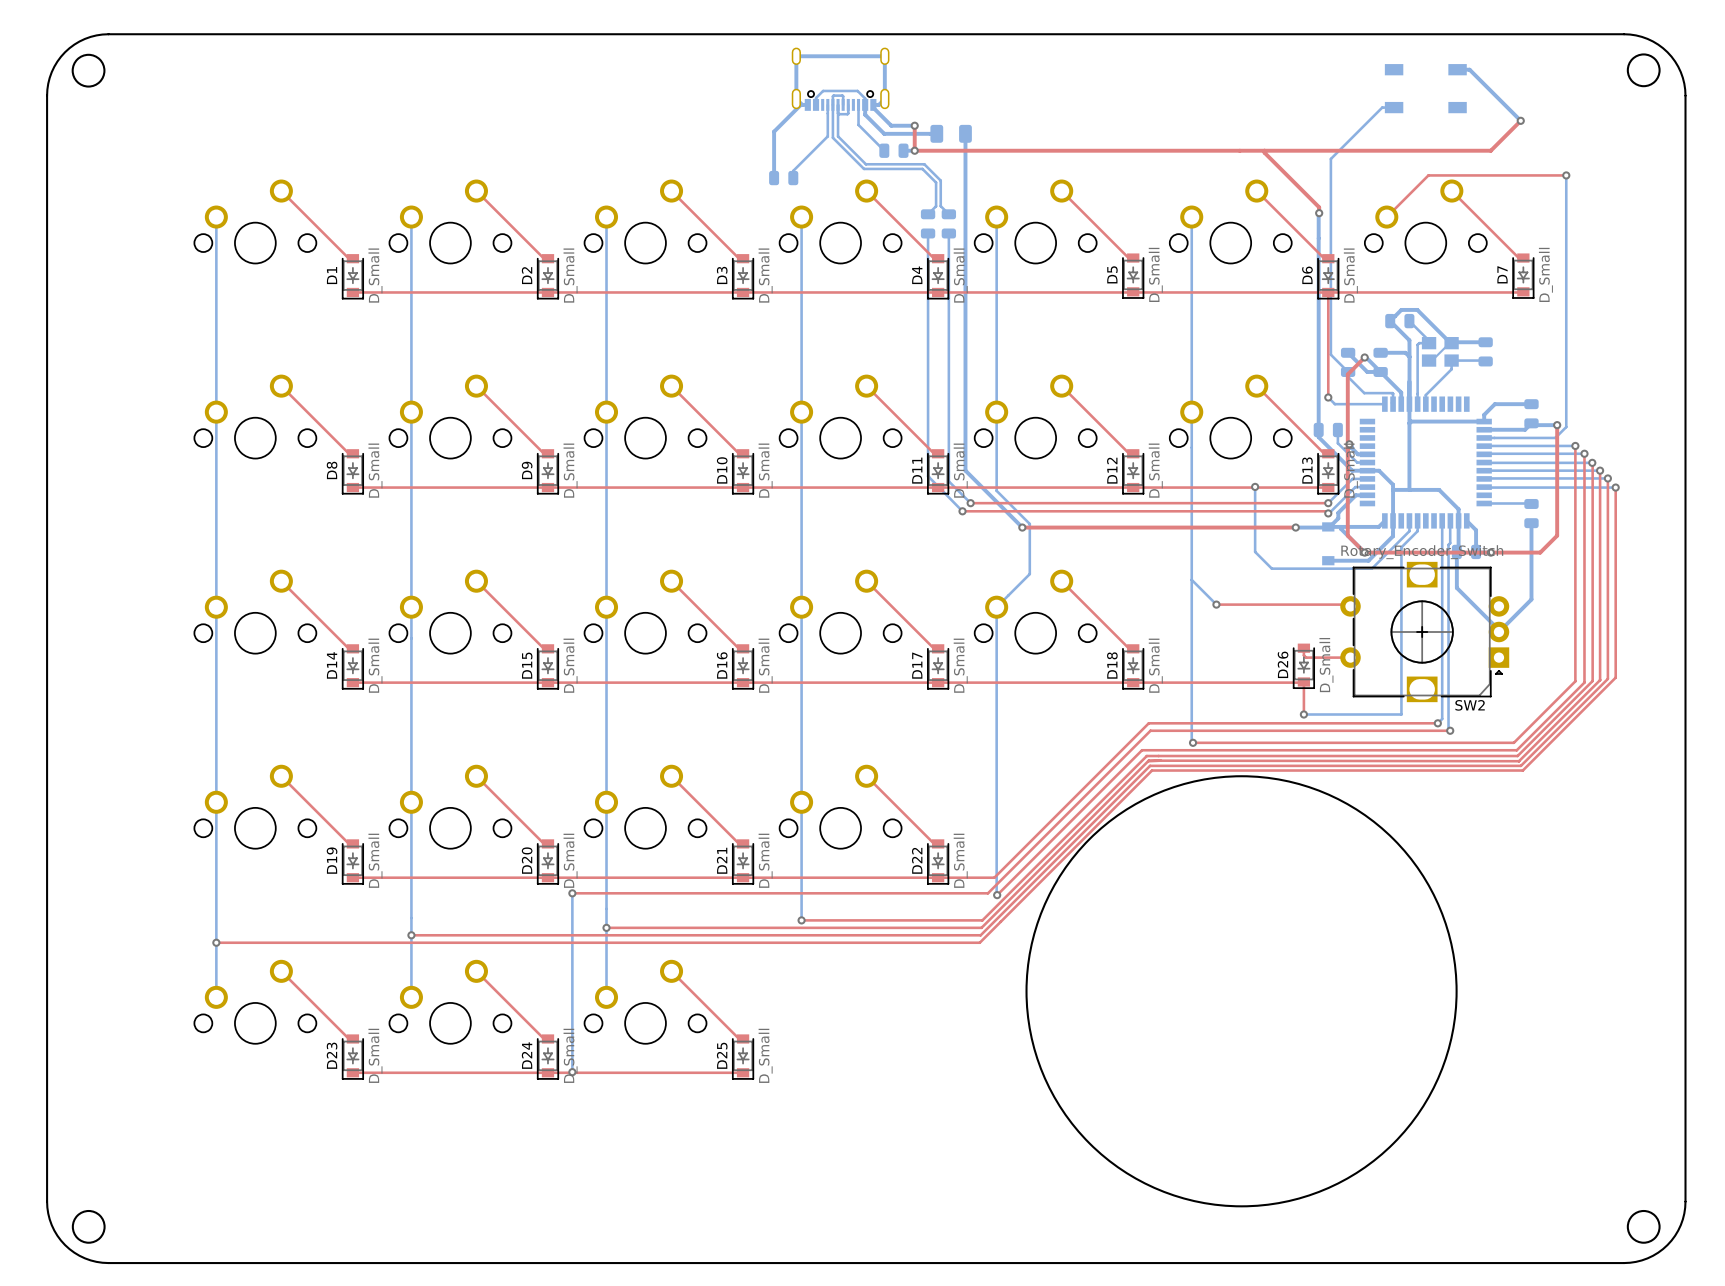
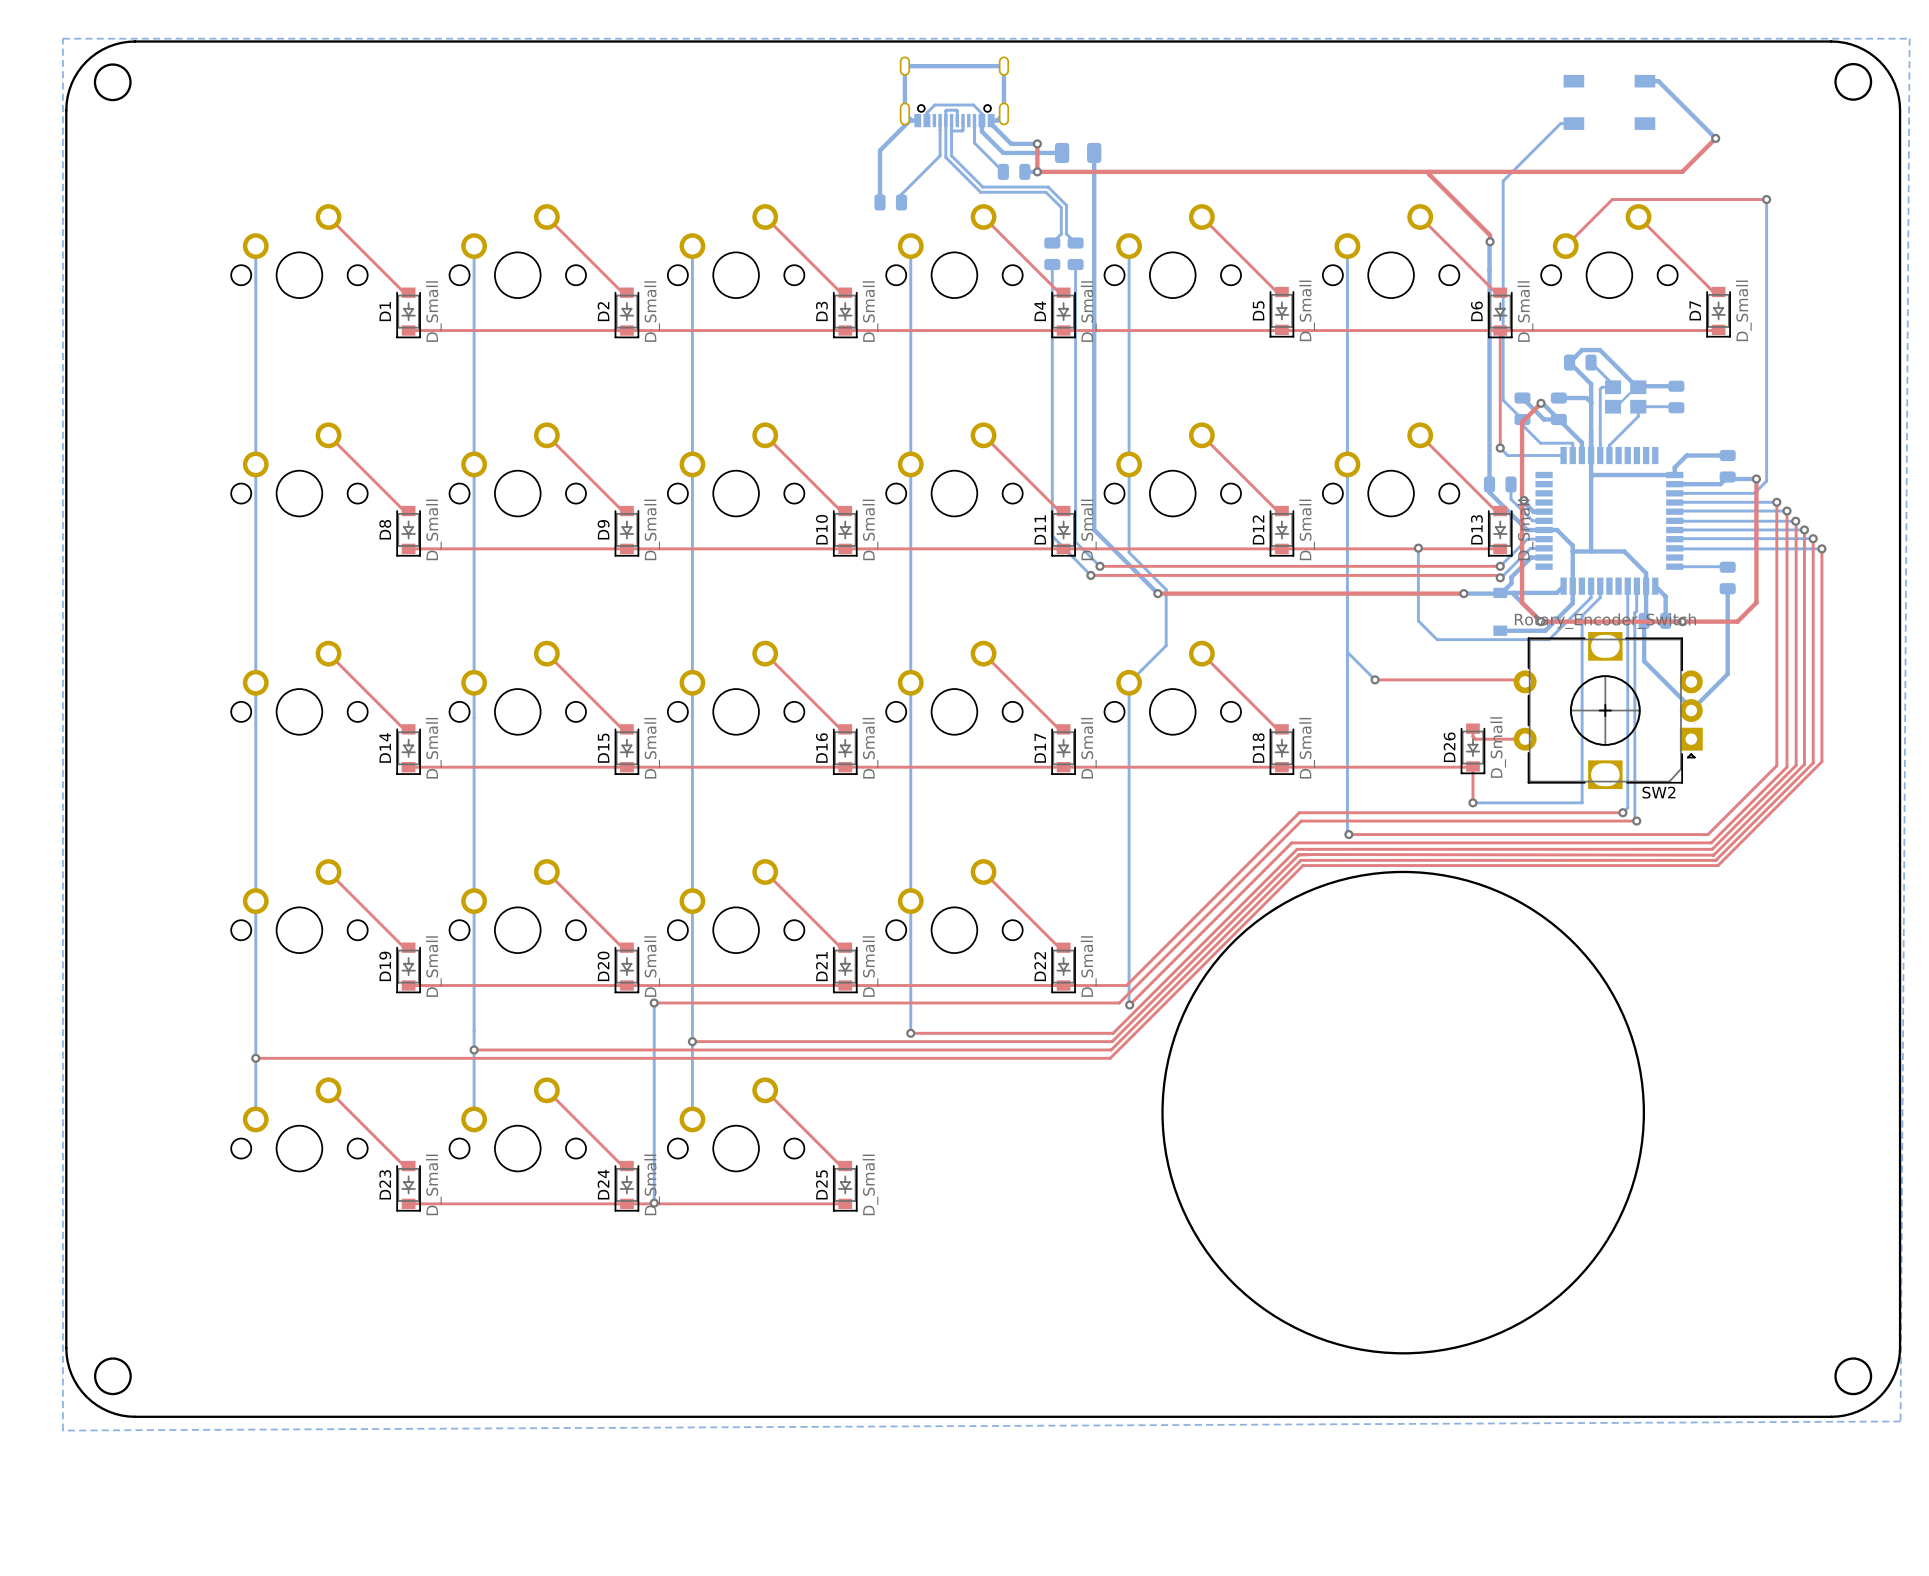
bottom zone outline: none -> (62, 38) (62, 1430) (1900, 1421) (1909, 38) (62, 38)

